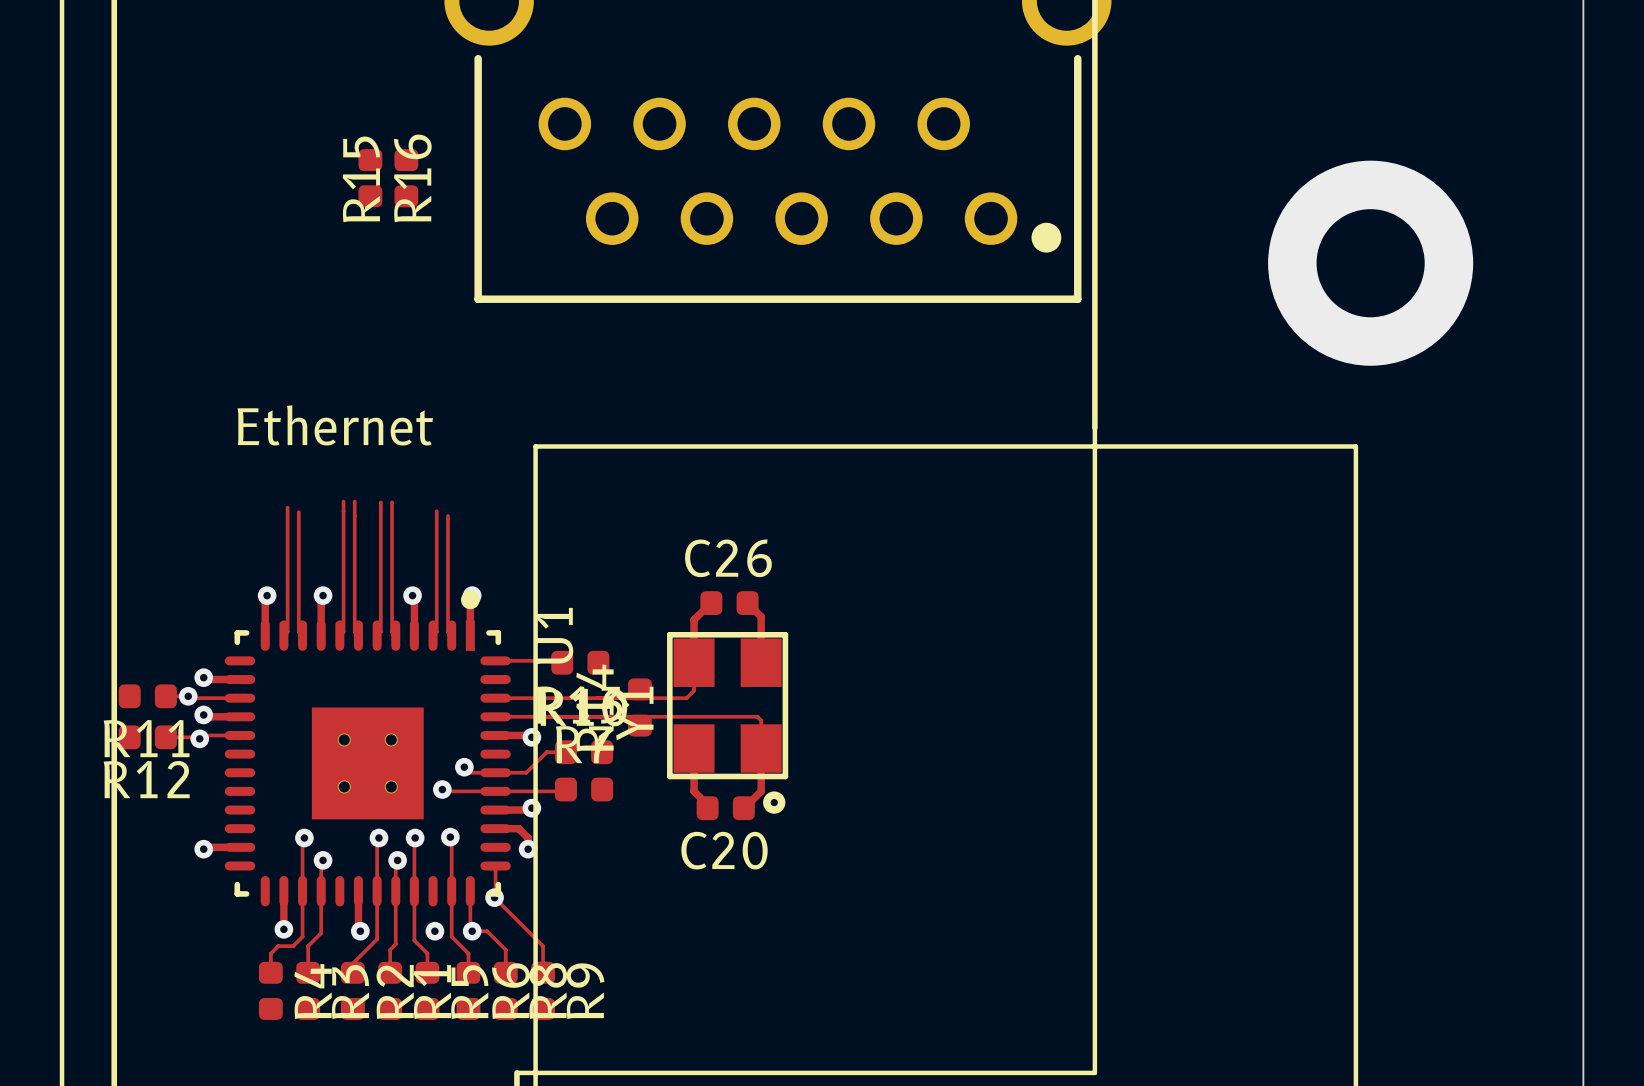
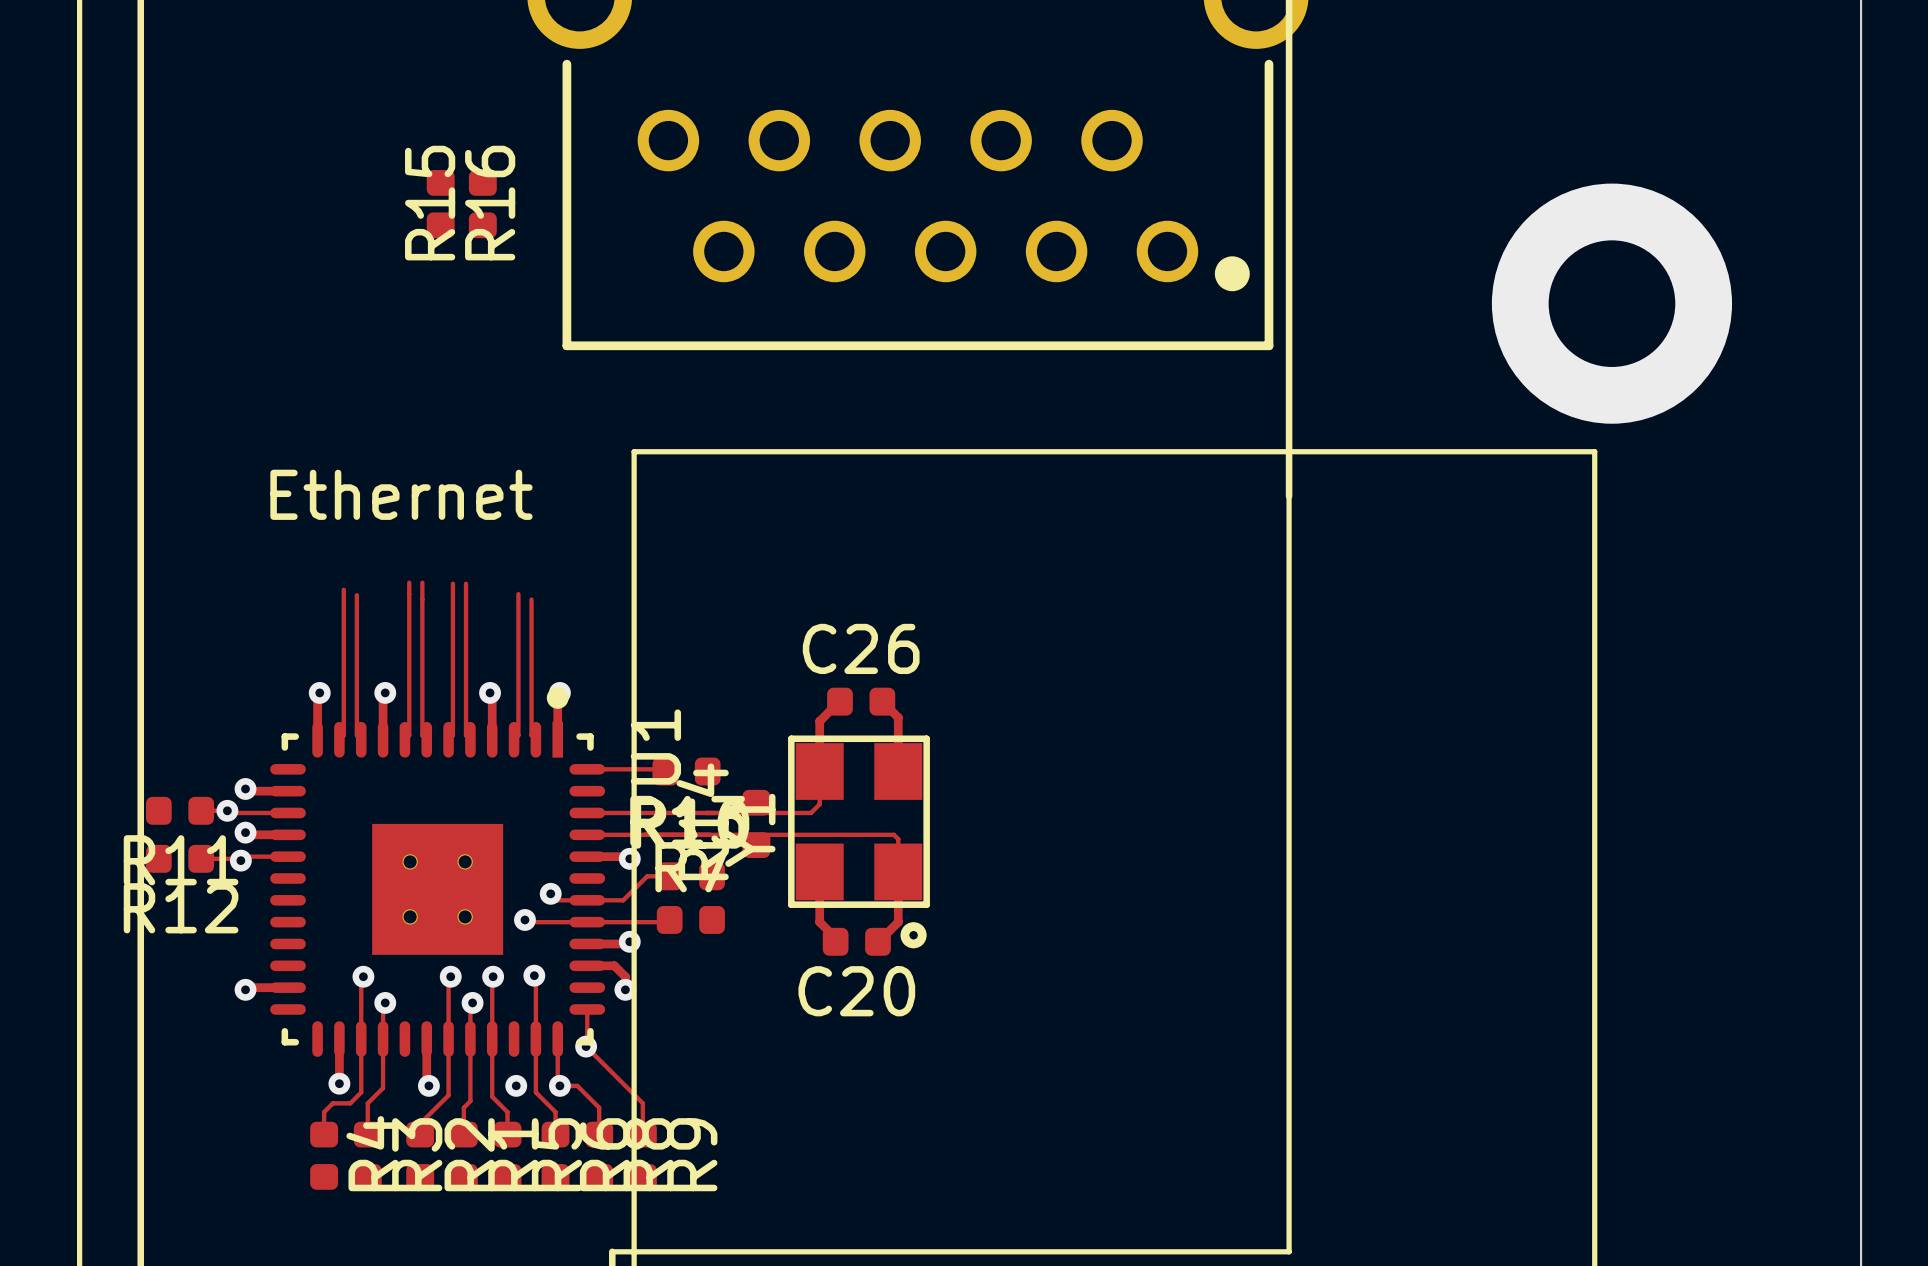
line: (535, 446) (1355, 446) -> (634, 518) (634, 451) (1594, 451) (1594, 518)

